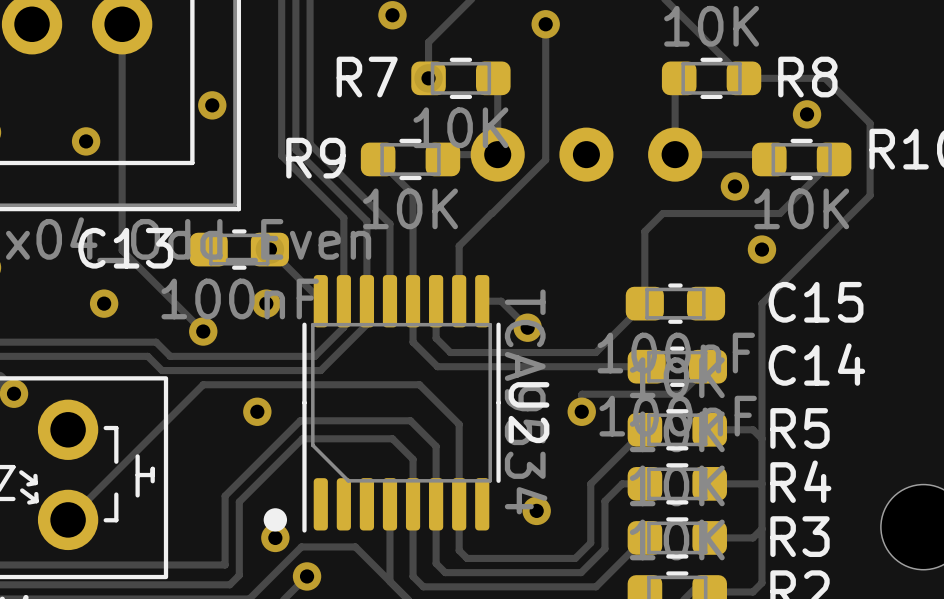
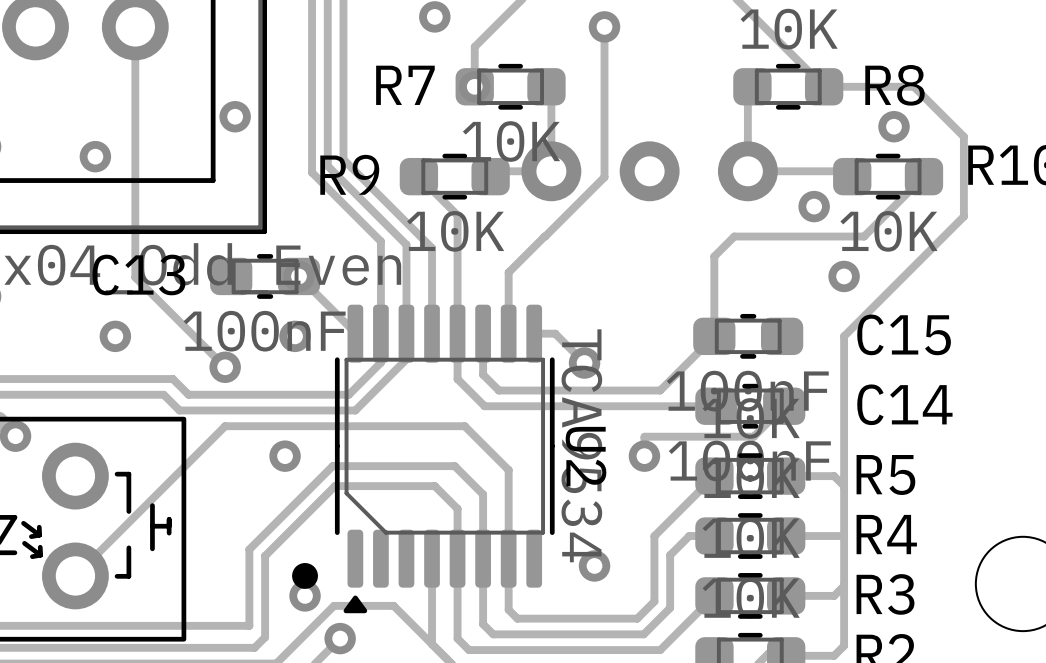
U2 footprint: [302, 275, 501, 533] -> [334, 304, 555, 614]

